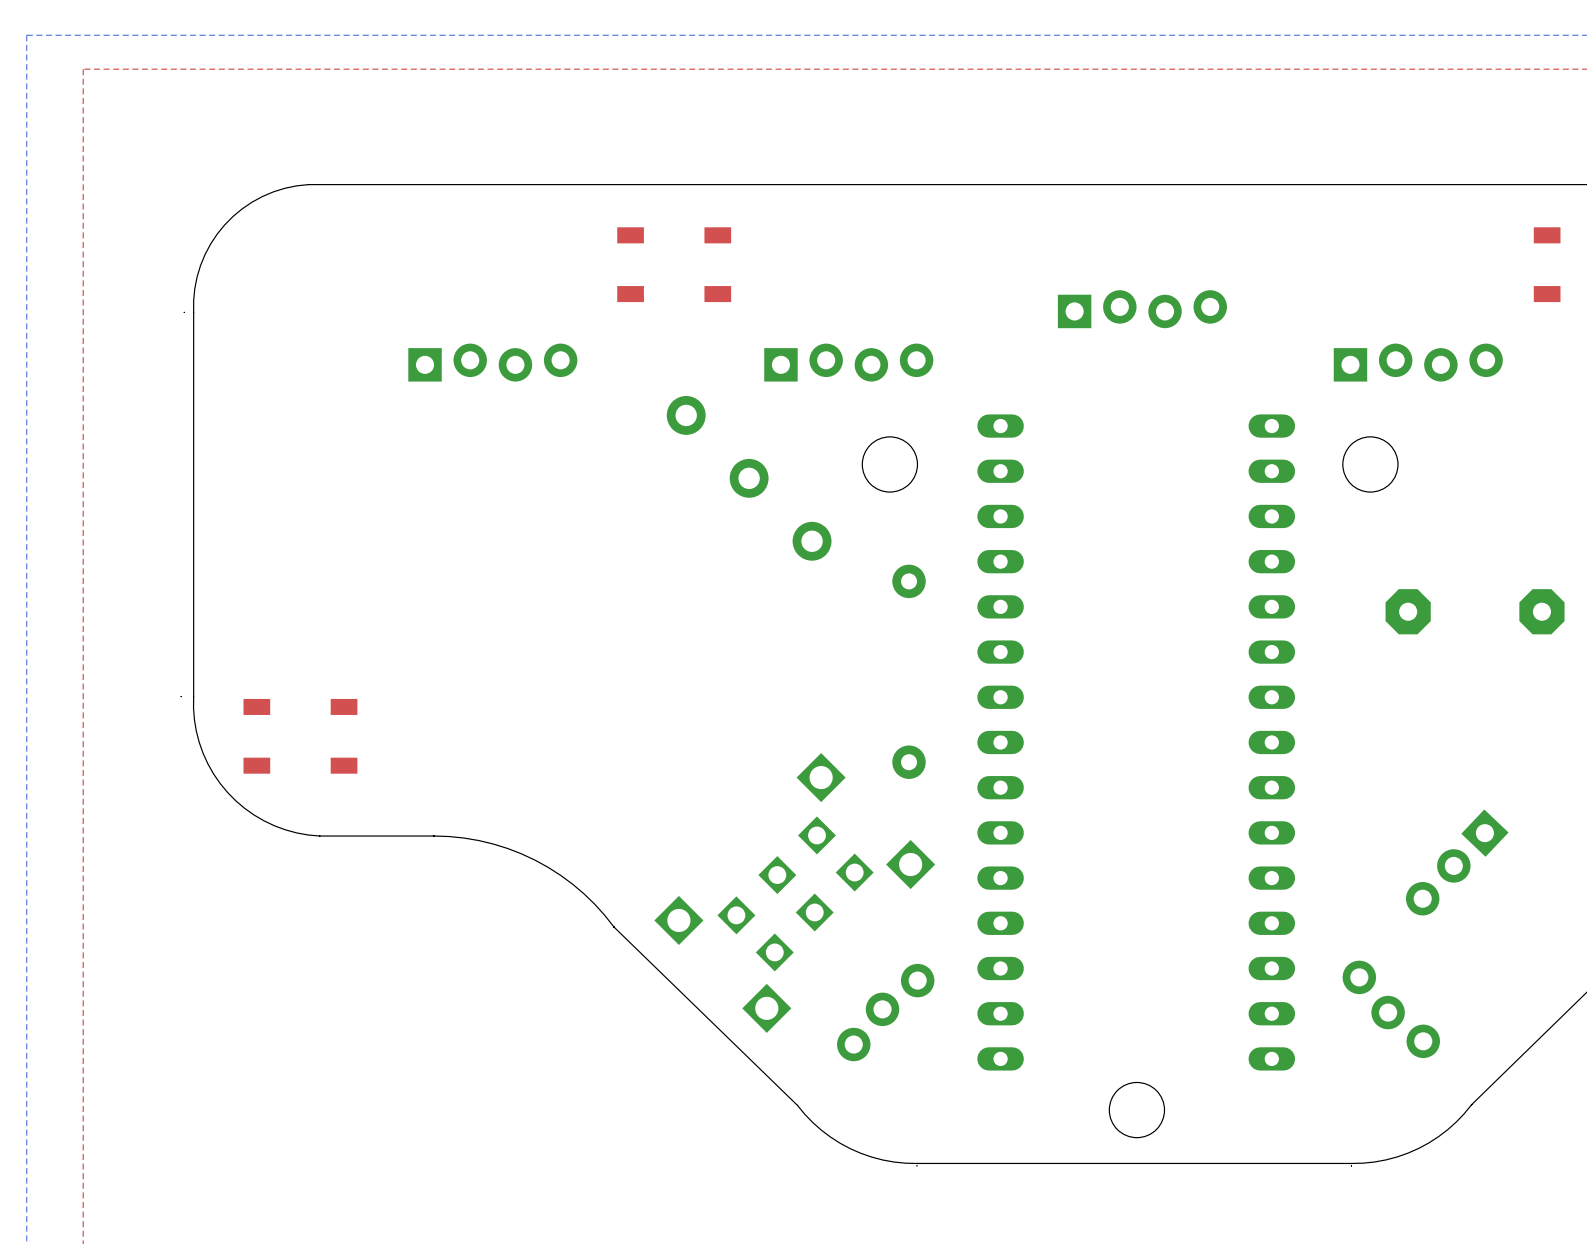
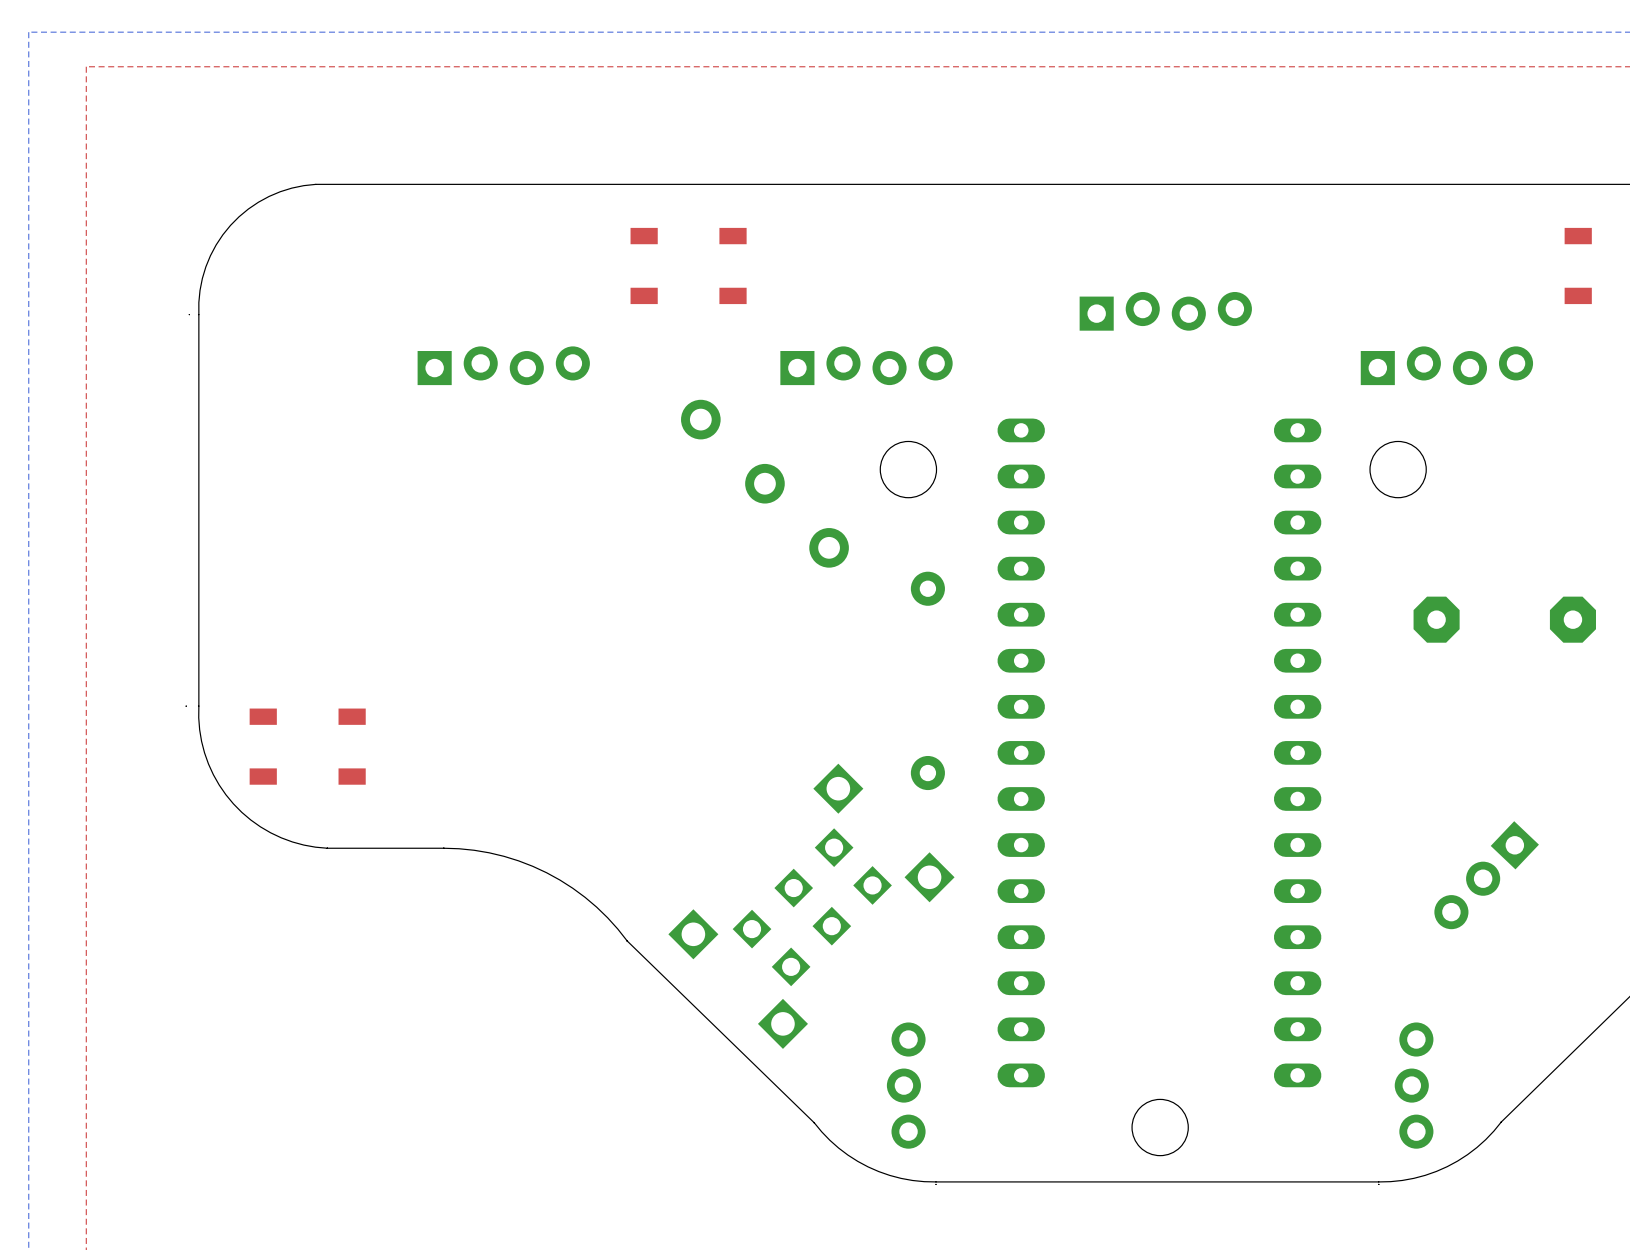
part: (1391, 1009) -> none
part: (885, 1012) -> none
part: none -> (906, 1085)
part: none -> (1414, 1085)

